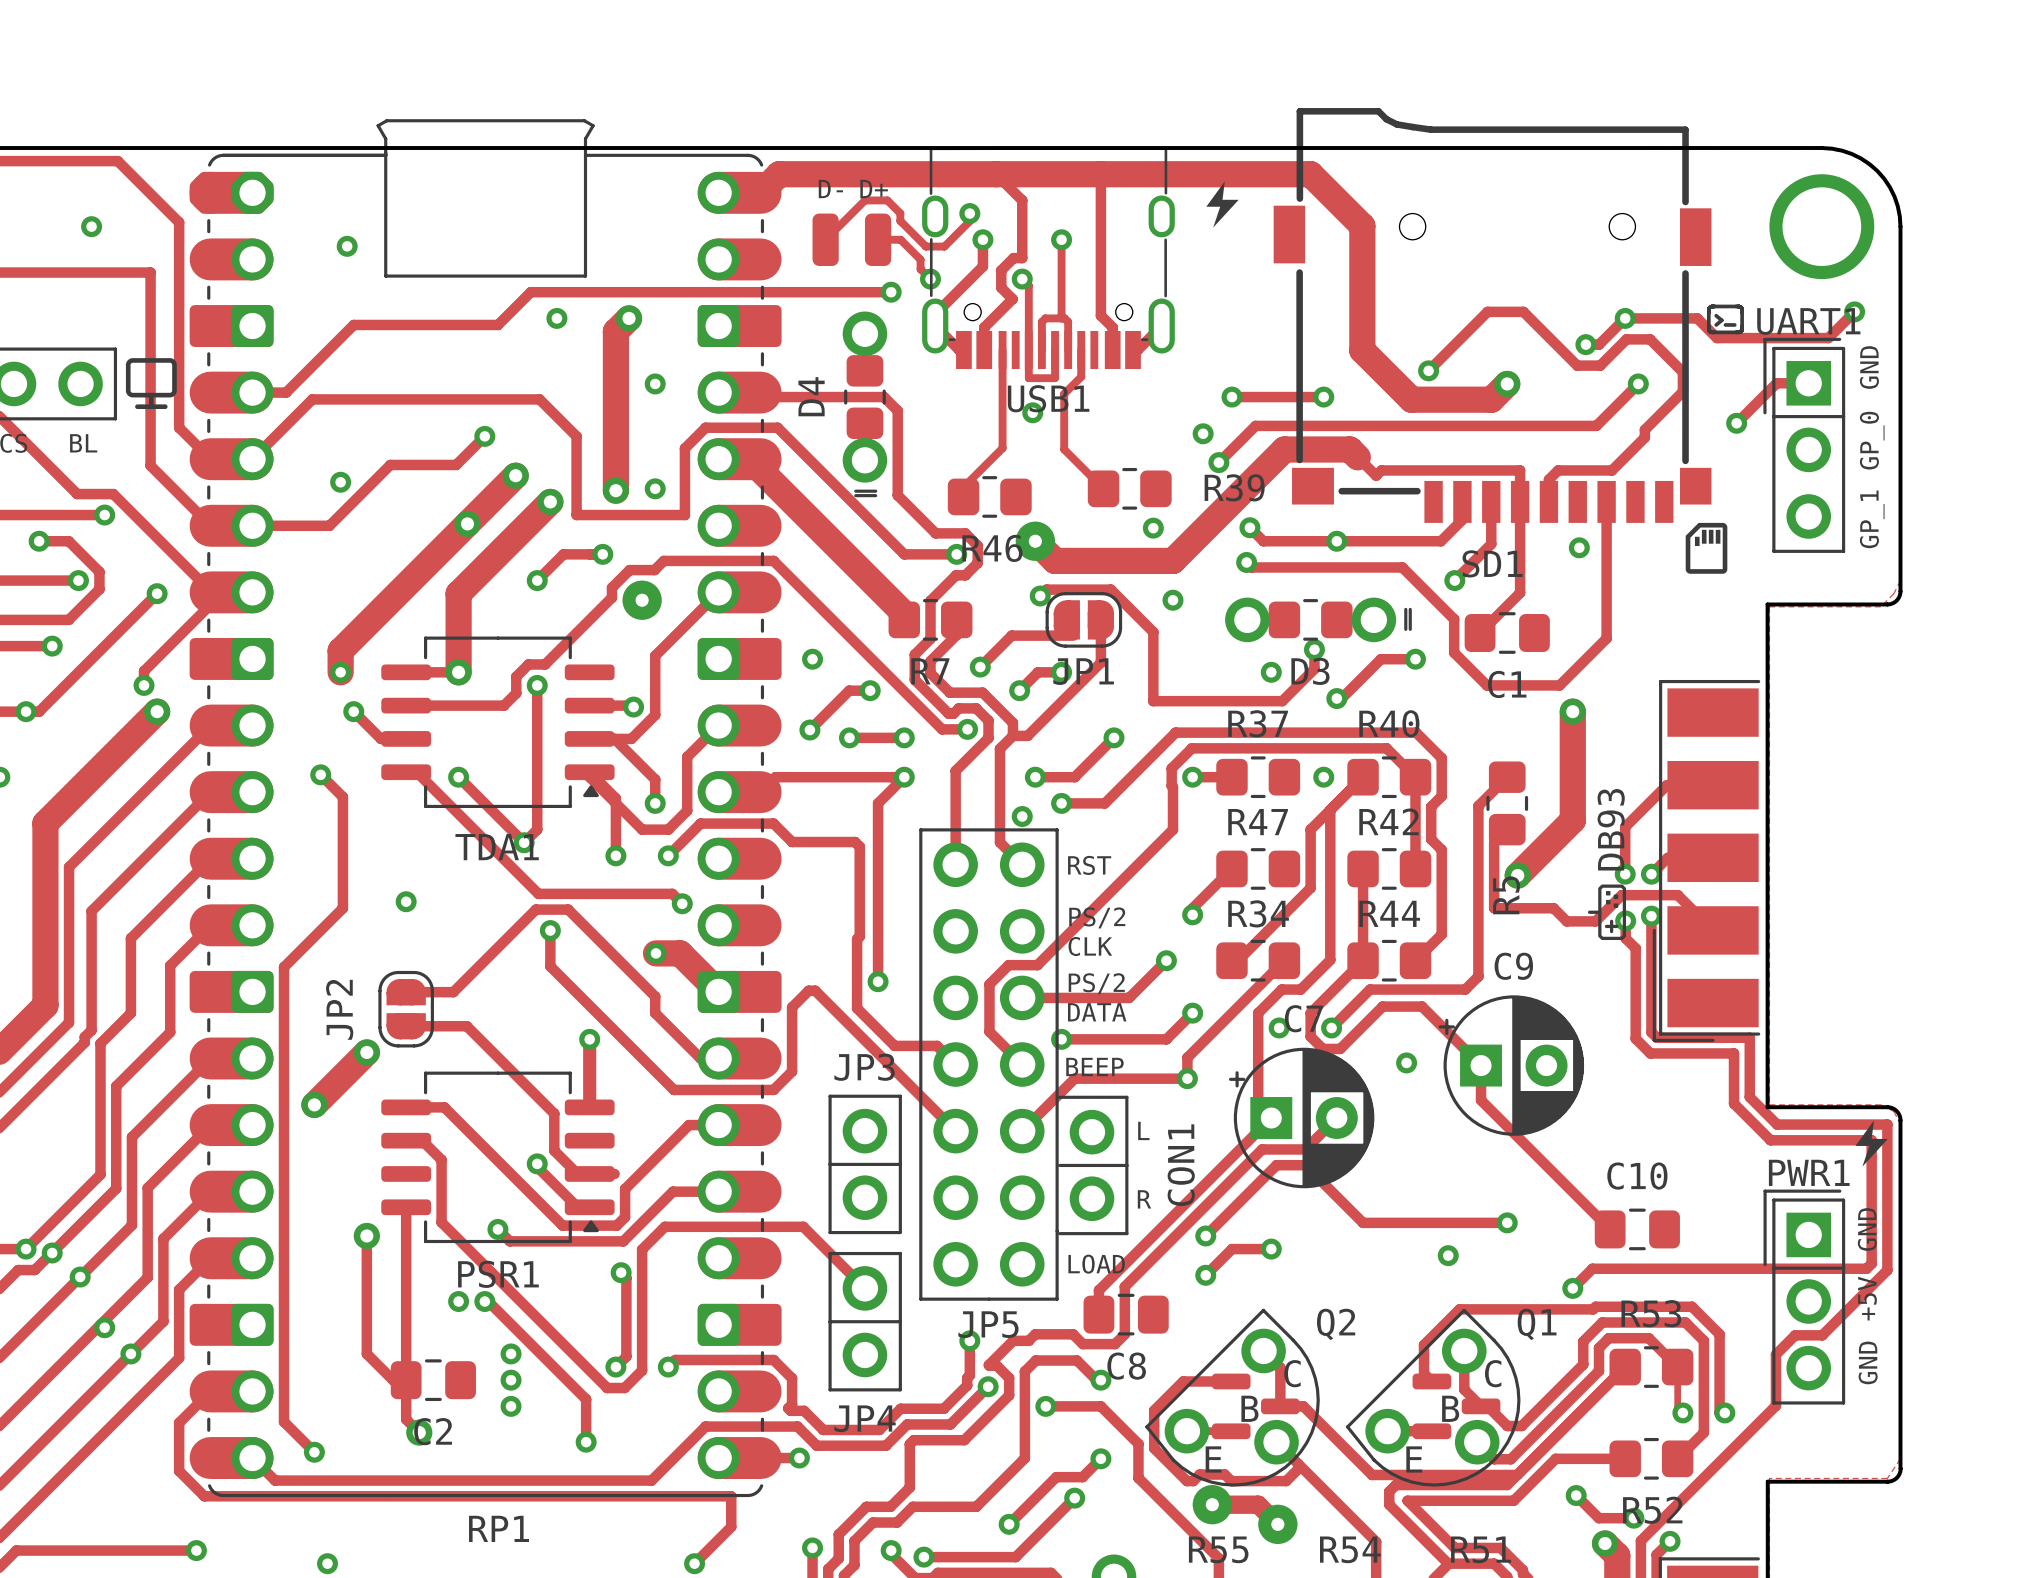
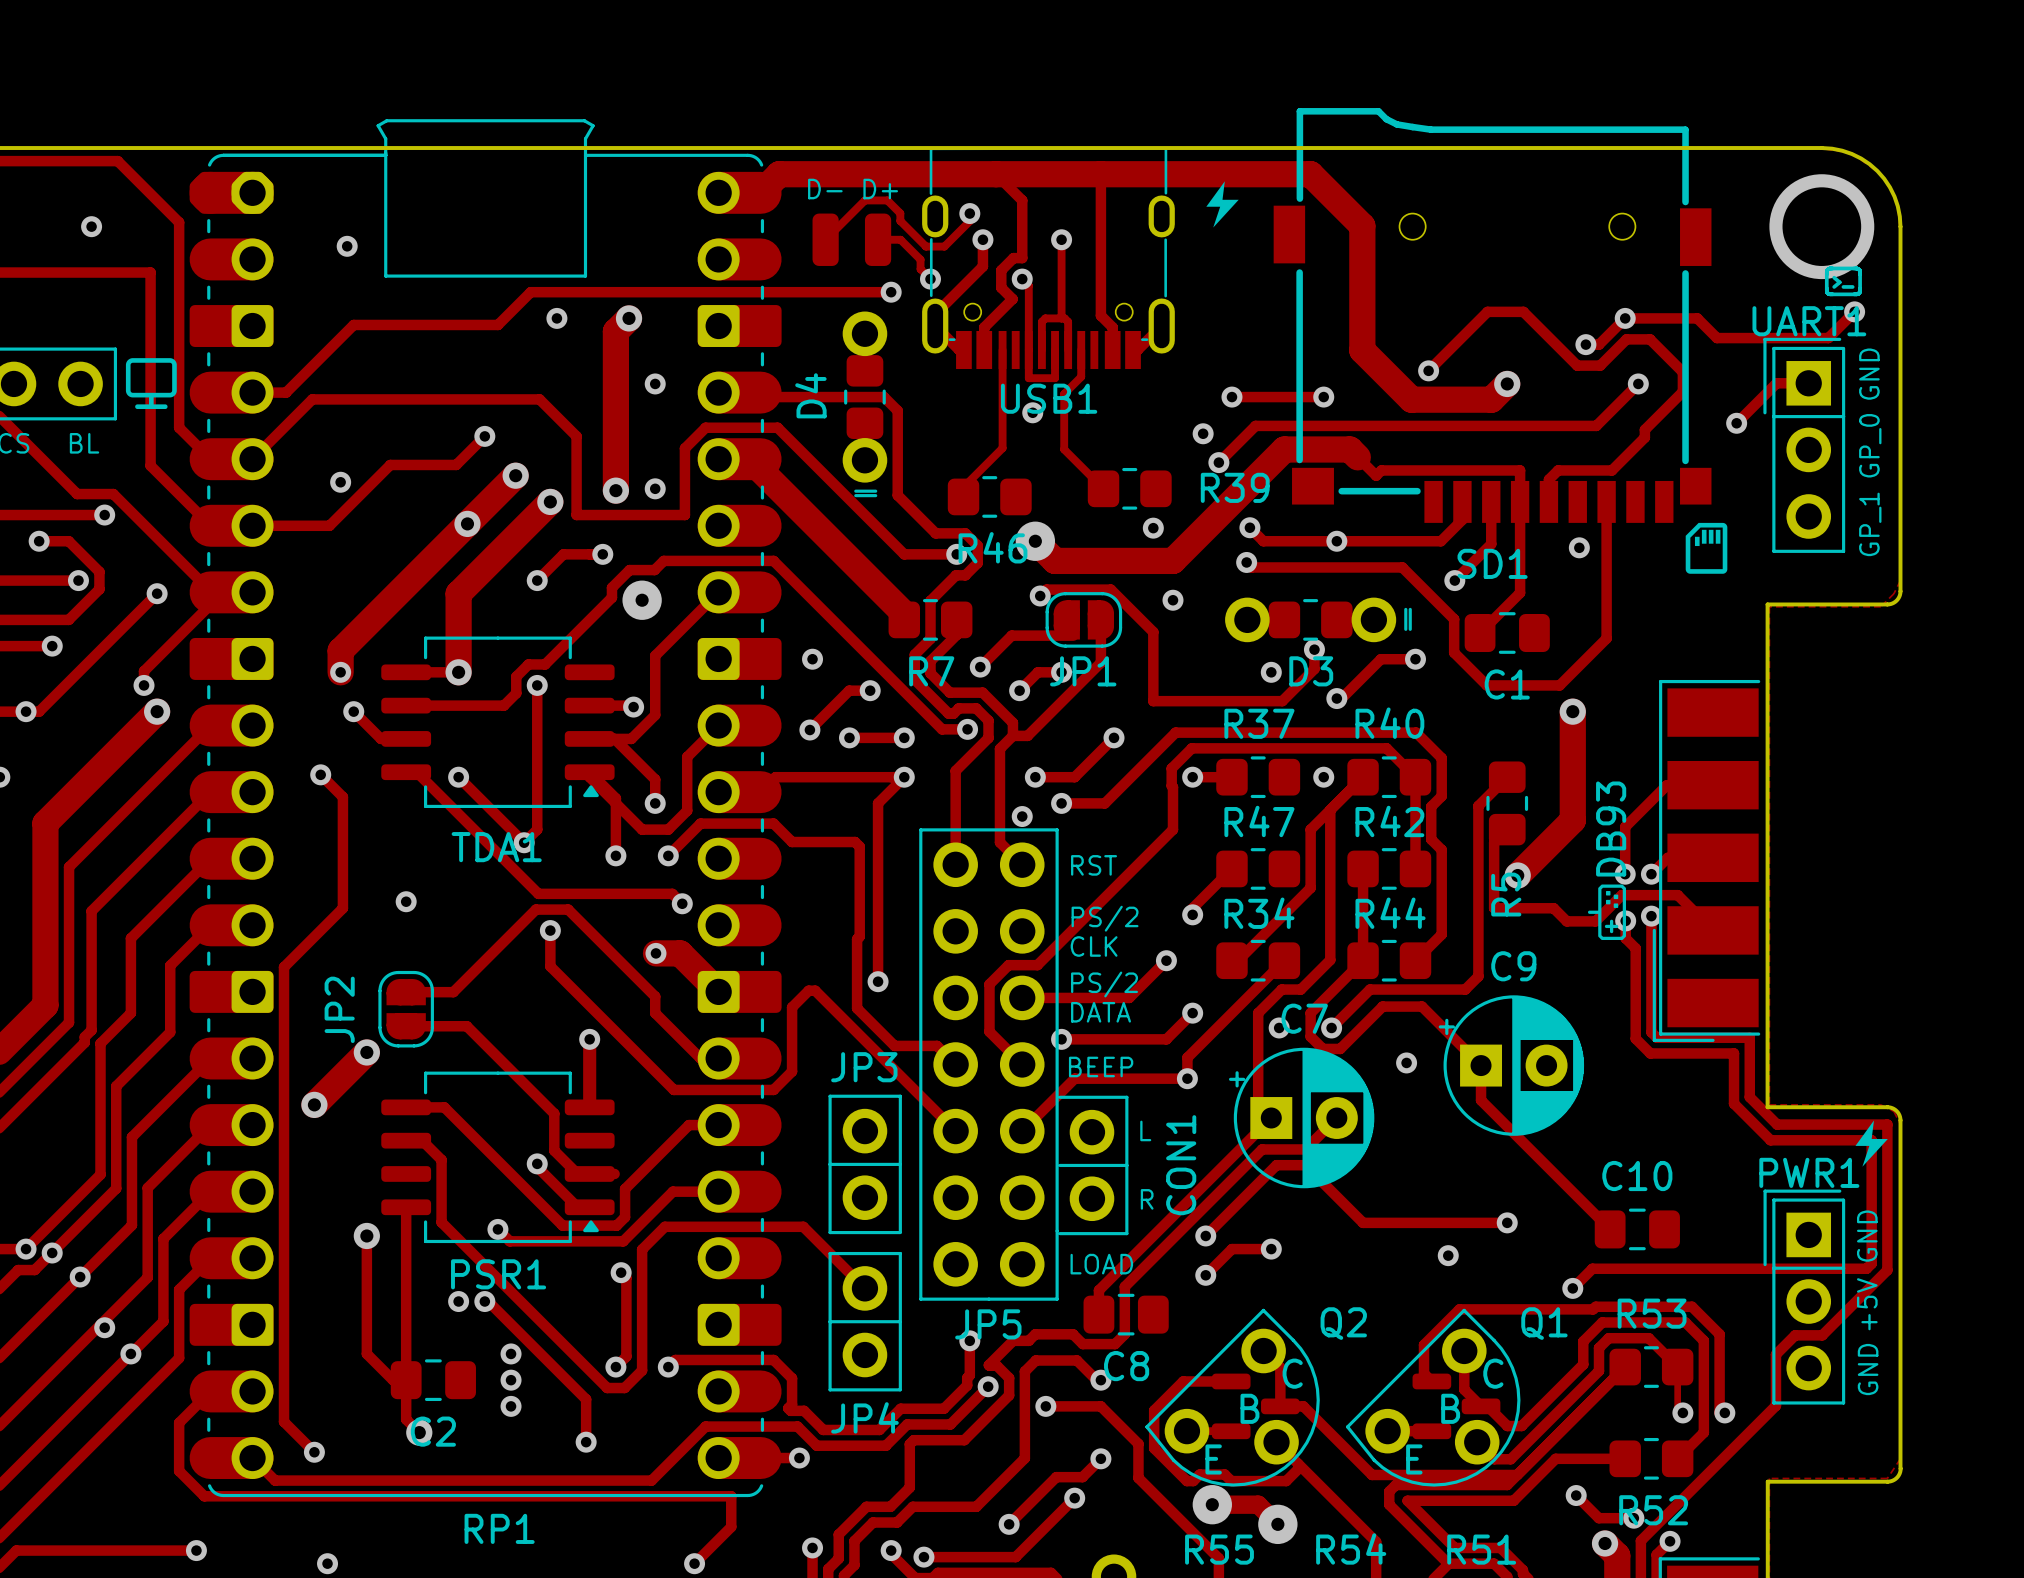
line: (1712, 306) (1738, 306) -> (1830, 268) (1856, 268)
line: (1708, 310) (1708, 328) -> (1826, 272) (1826, 290)
line: (1742, 310) (1742, 328) -> (1860, 272) (1860, 290)
line: (1716, 315) (1721, 320) (1716, 324) -> (1834, 277) (1839, 282) (1834, 286)
line: (1725, 324) (1734, 324) -> (1843, 286) (1852, 286)
line: (1712, 332) (1738, 332) -> (1830, 294) (1856, 294)

